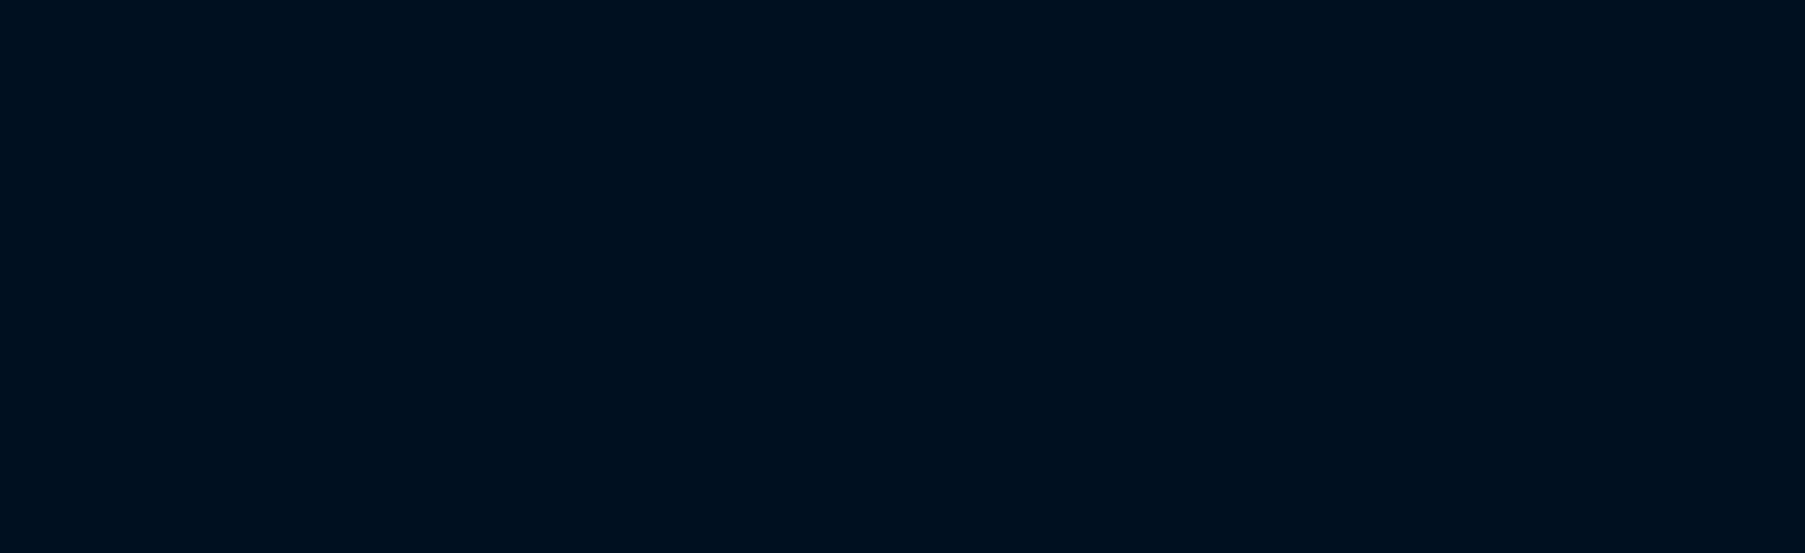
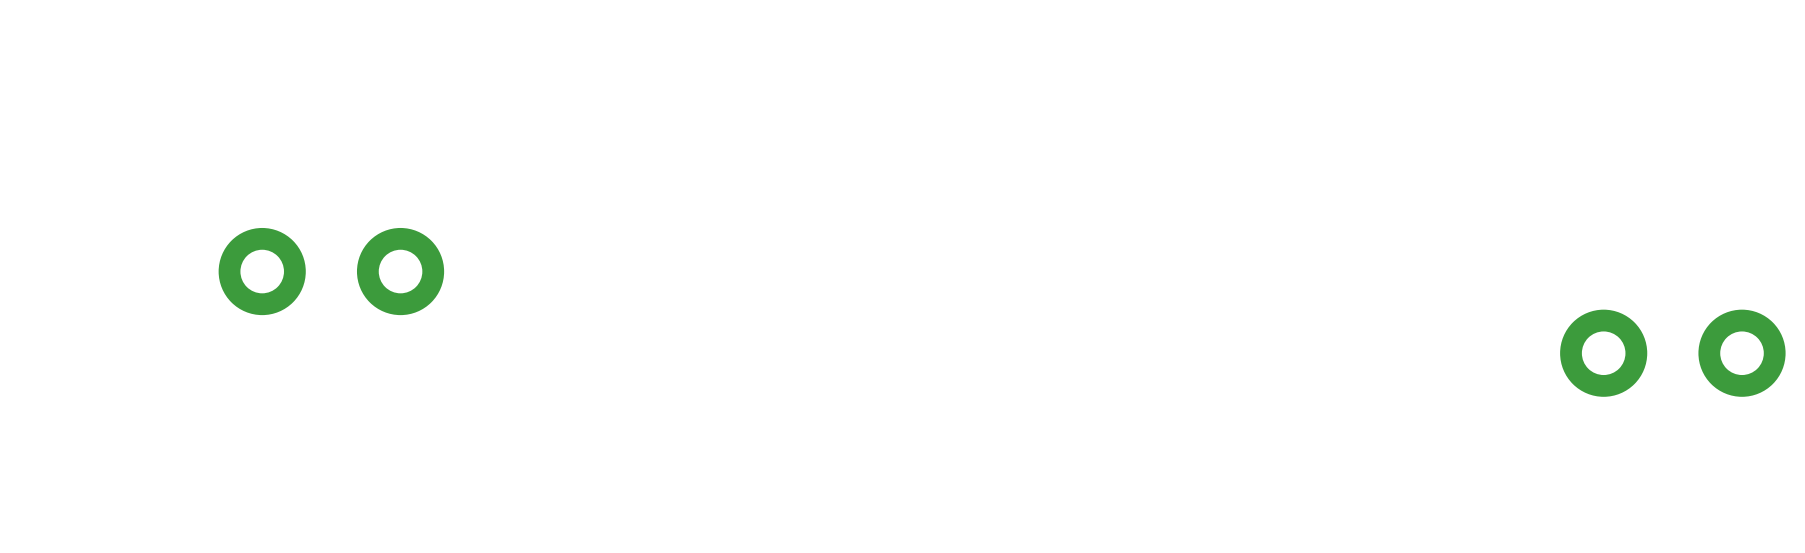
part: none -> (331, 271)
part: none -> (1672, 353)

